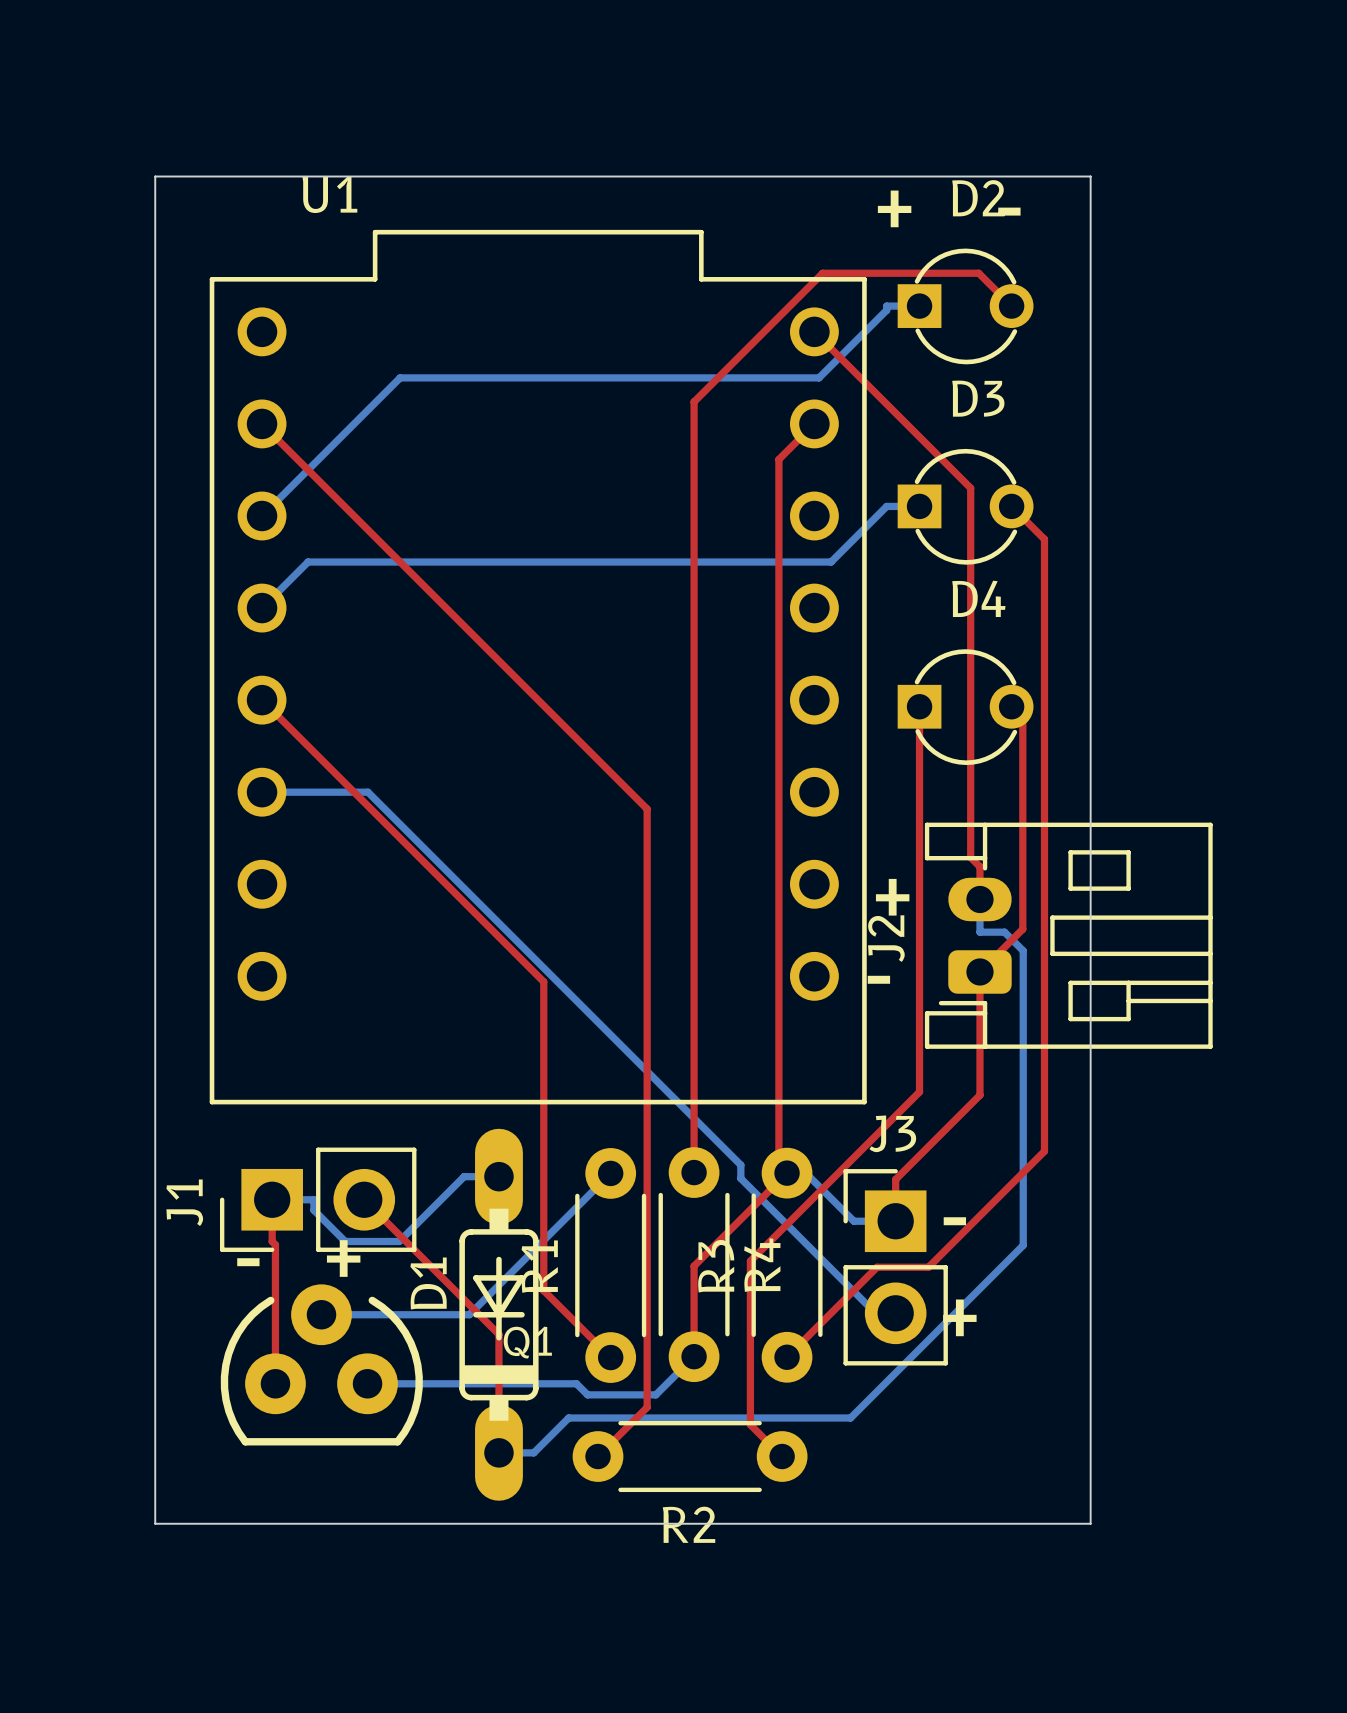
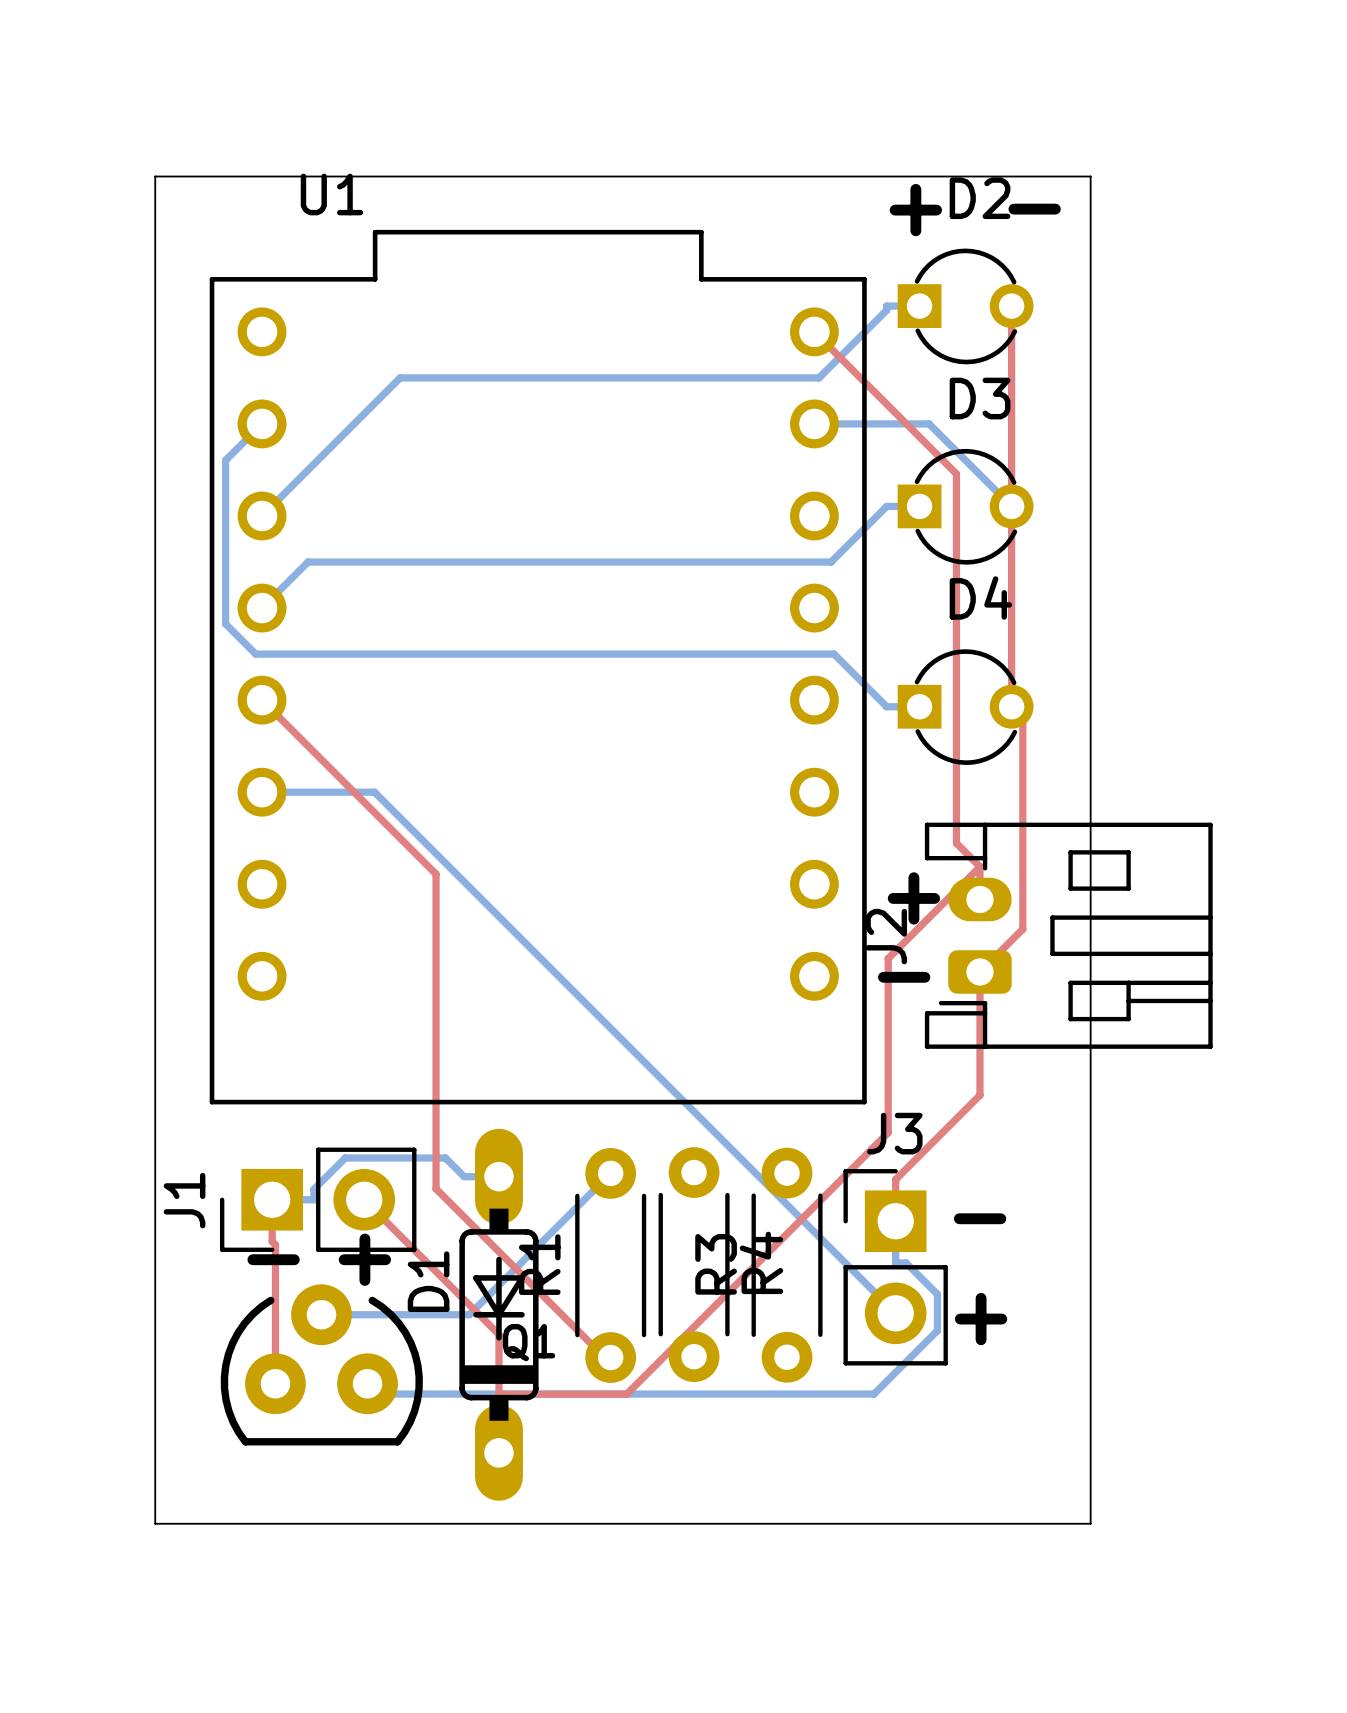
top track: (1011, 306) (978, 273) (822, 273) (694, 401) (694, 1172) -> (1011, 306) (1011, 706)
top track: (262, 423) (647, 809) (647, 1407) (598, 1456) -> none
bottom track: none -> (262, 423) (225, 460) (225, 623) (255, 654) (834, 654) (886, 706) (919, 706)
top track: (814, 423) (778, 459) (778, 1164) (787, 1173) (694, 1266) (694, 1356) -> none
bottom track: none -> (814, 423) (929, 423) (1011, 506)
top track: (956, 473) (970, 488) (970, 857) -> (956, 473) (956, 843) (970, 857)
top track: (1011, 506) (1044, 539) (1044, 1151) (928, 1267) (877, 1267) (787, 1357) -> none
top track: (919, 706) (919, 1091) (750, 1261) (750, 1424) (782, 1456) -> none
bottom track: (367, 792) (740, 1165) (740, 1178) (875, 1313) (895, 1313) -> (367, 792) (374, 792) (895, 1313)
top track: none -> (979, 866) (888, 958) (888, 1132) (626, 1394) (498, 1394)
top track: (436, 874) (543, 981) (543, 1290) (610, 1357) -> (436, 874) (436, 1188) (604, 1357) (610, 1357)
bottom track: (979, 899) (979, 932) (1004, 932) (1023, 950) (1023, 1245) (850, 1418) (568, 1418) (533, 1452) (498, 1452) -> none
bottom track: (787, 1173) (805, 1173) (853, 1221) (895, 1221) -> none
bottom track: (464, 1176) (399, 1241) (345, 1241) (313, 1210) (313, 1199) -> (464, 1176) (445, 1158) (345, 1158) (313, 1189) (313, 1199)
bottom track: (694, 1356) (655, 1394) (587, 1394) (576, 1383) (367, 1383) -> (895, 1221) (895, 1262) (906, 1262) (937, 1294) (937, 1330) (874, 1394) (377, 1394) (367, 1383)
R2: (690, 1456) -> none

